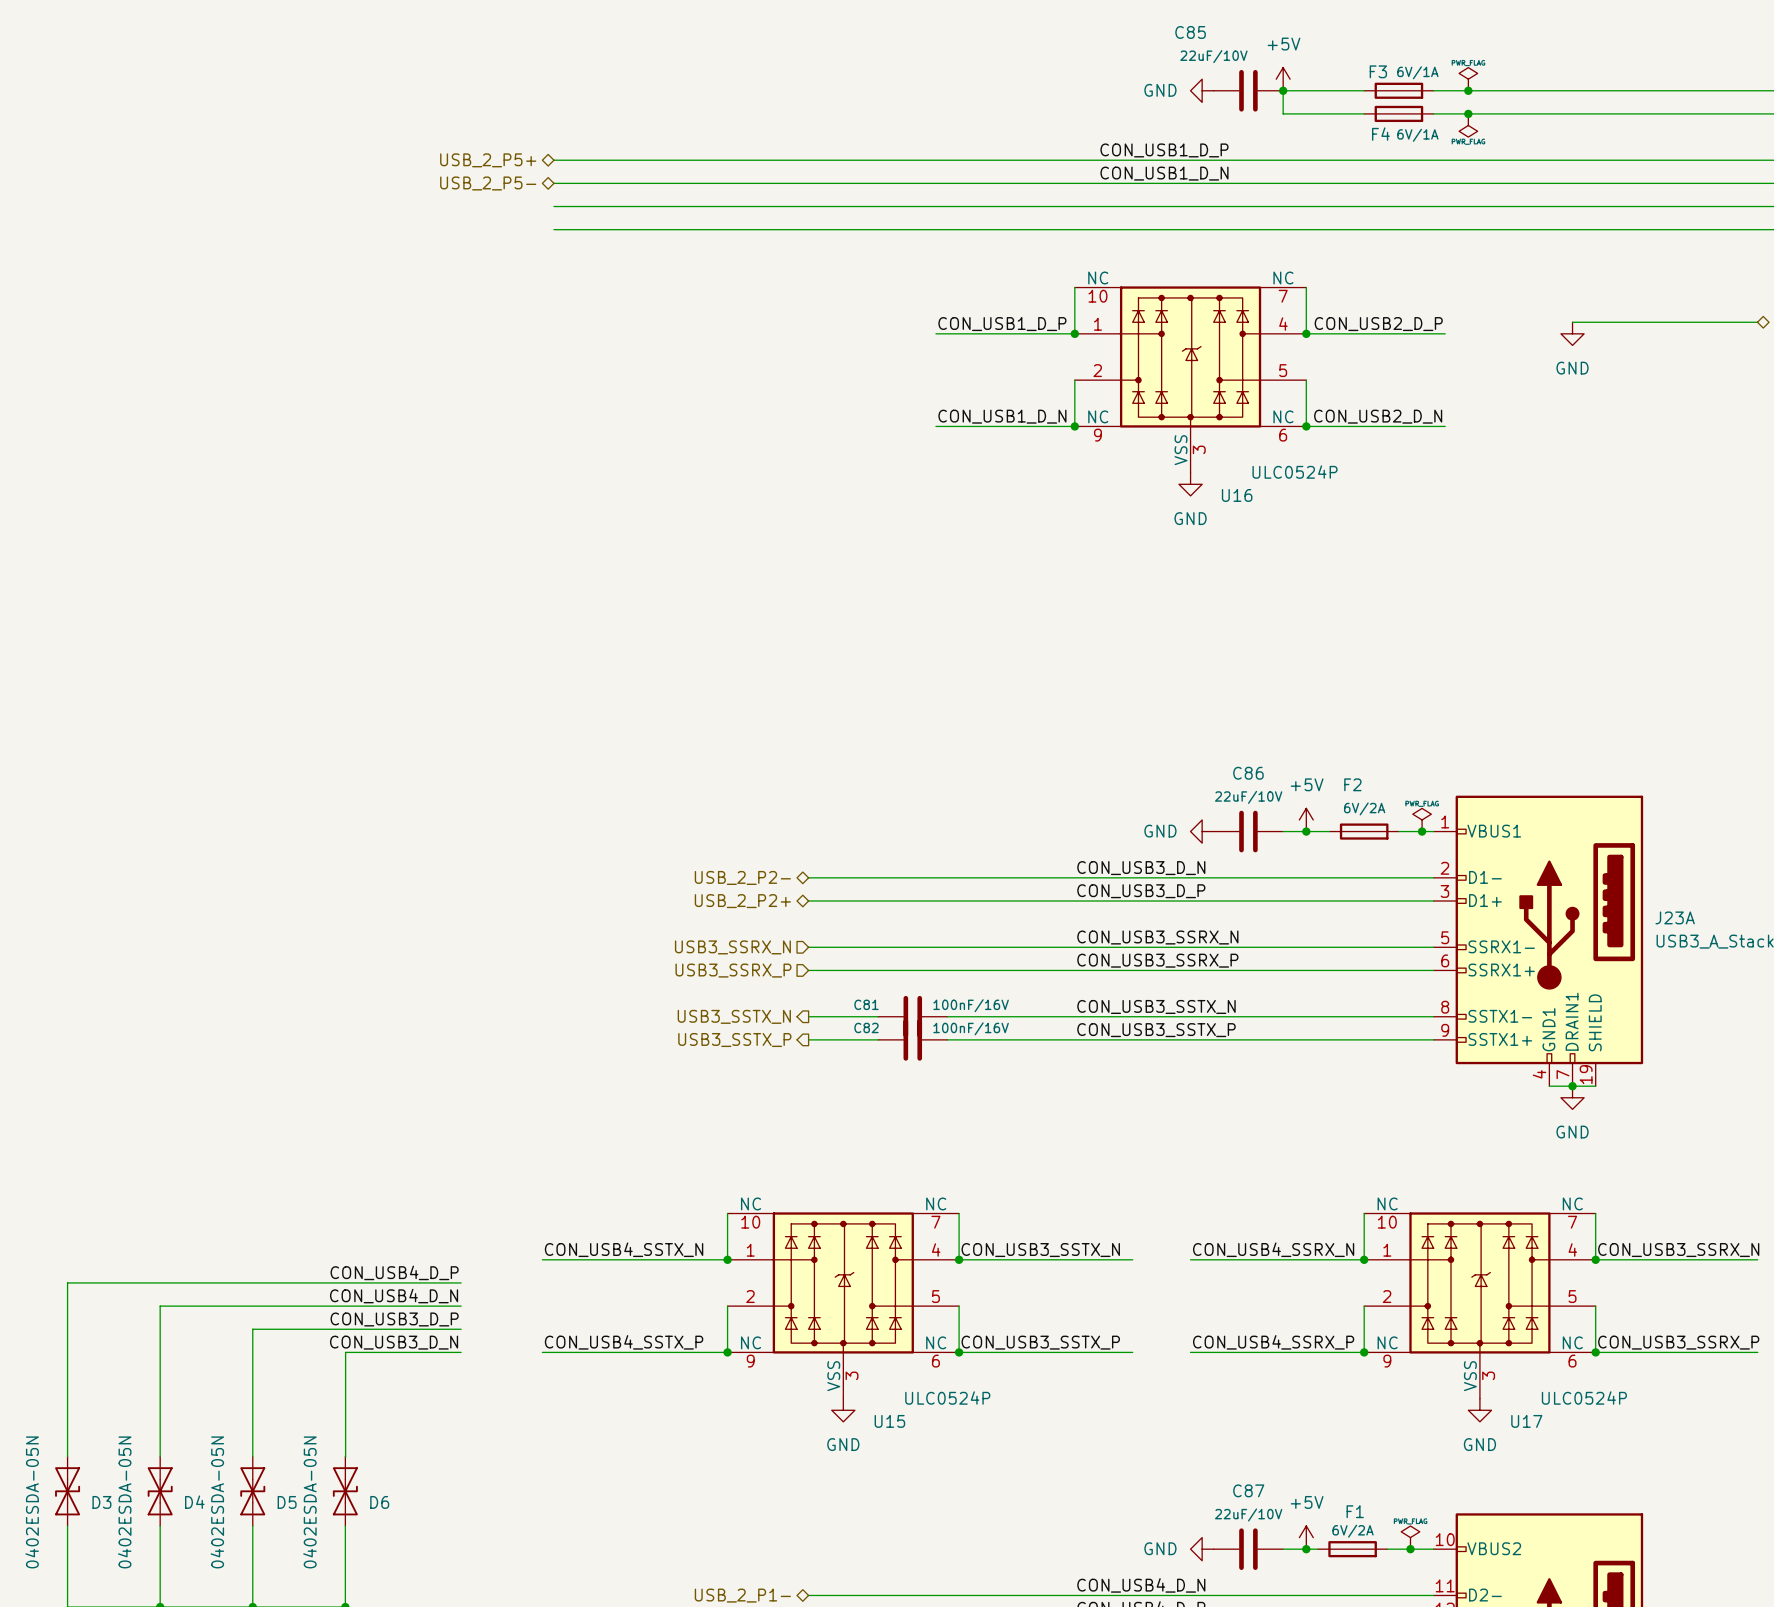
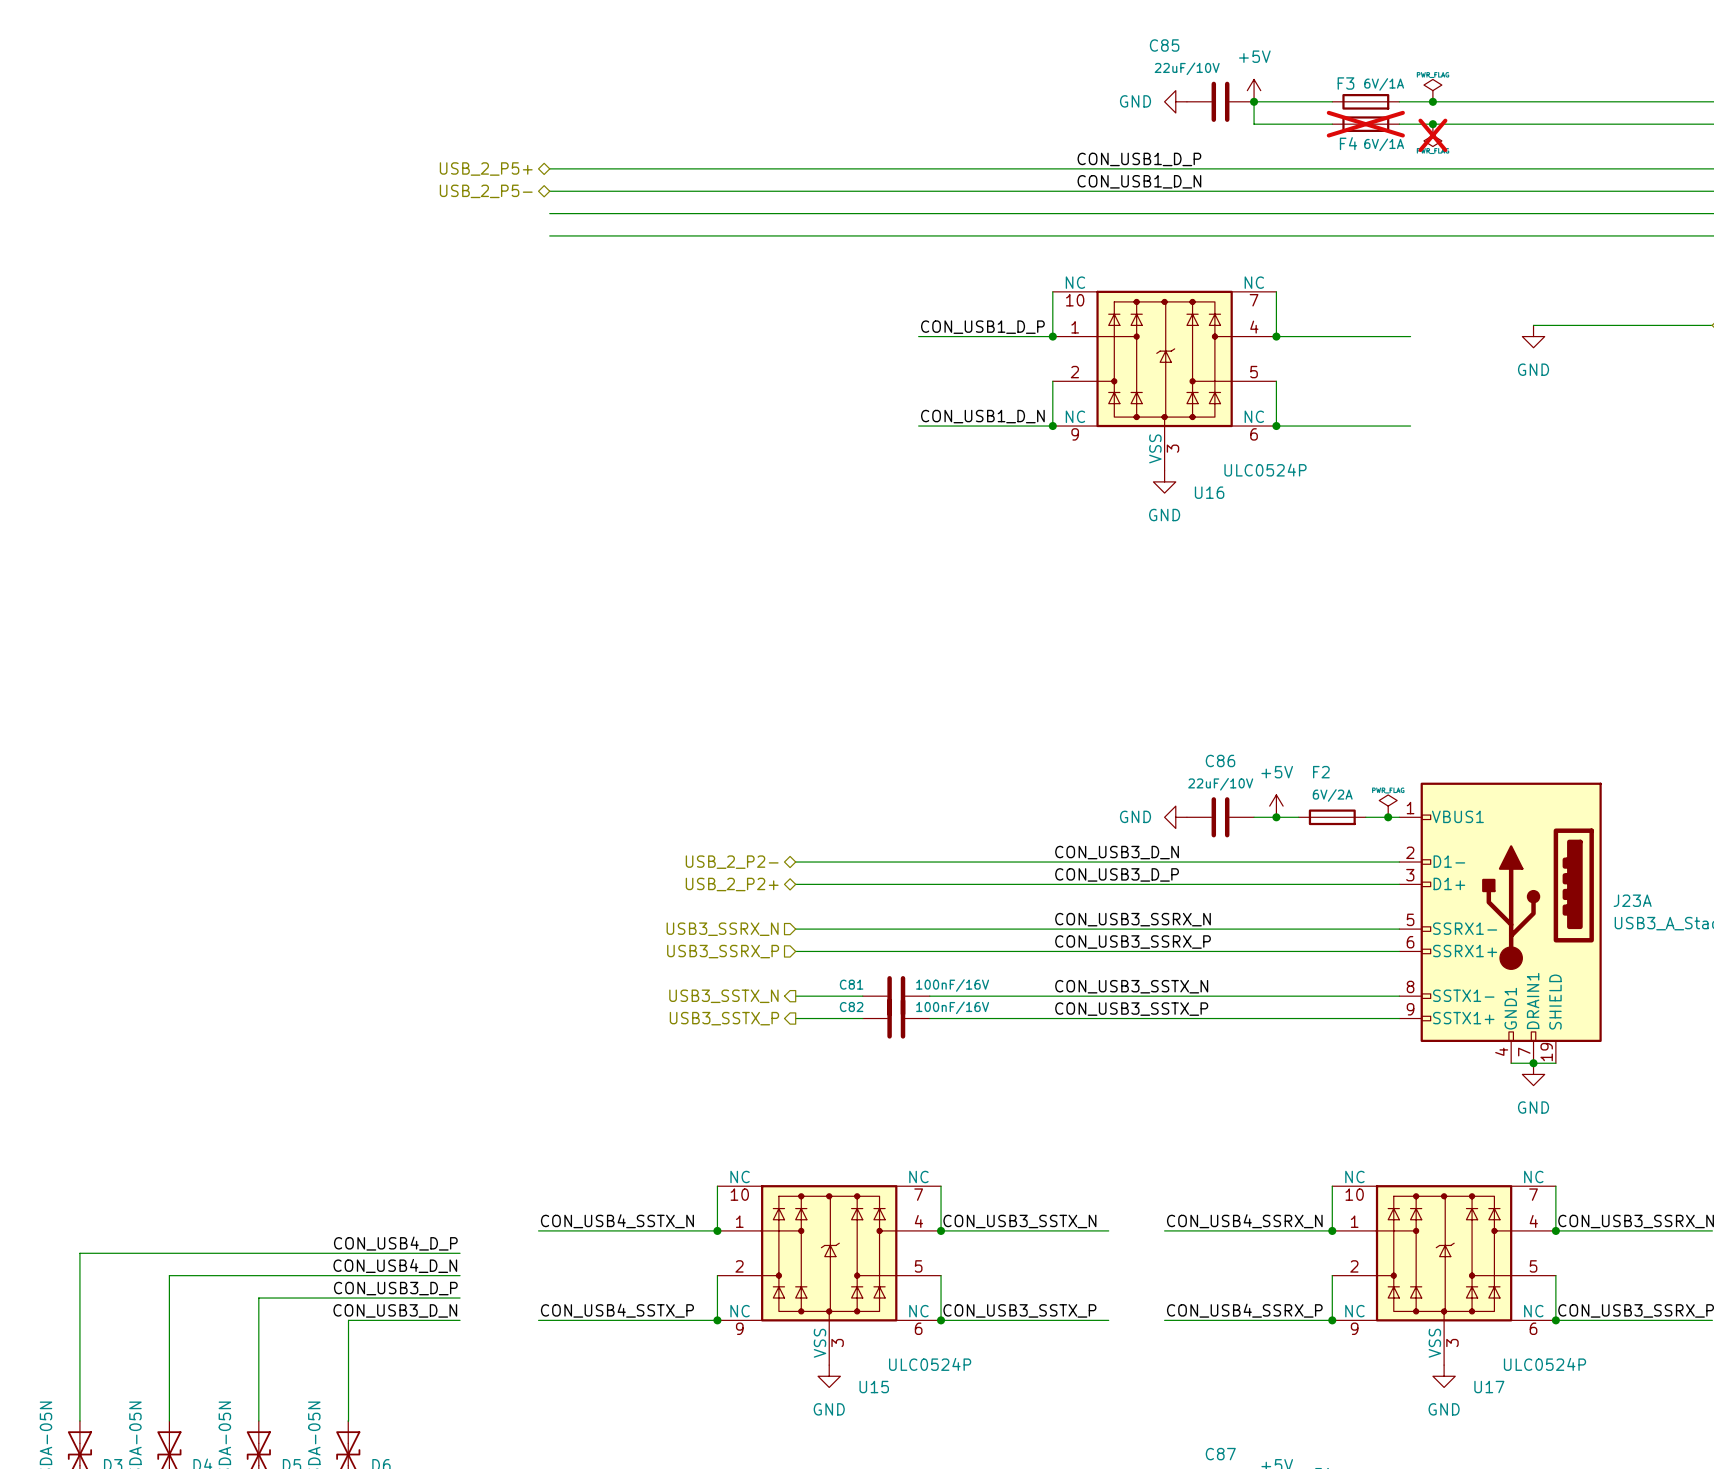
F4 do-not-place cross: none -> (1365, 124)
power symbol do-not-place cross: none -> (1432, 135)
label: CON_USB2_D_P (1378, 324) -> none
label: CON_USB2_D_N (1378, 416) -> none

